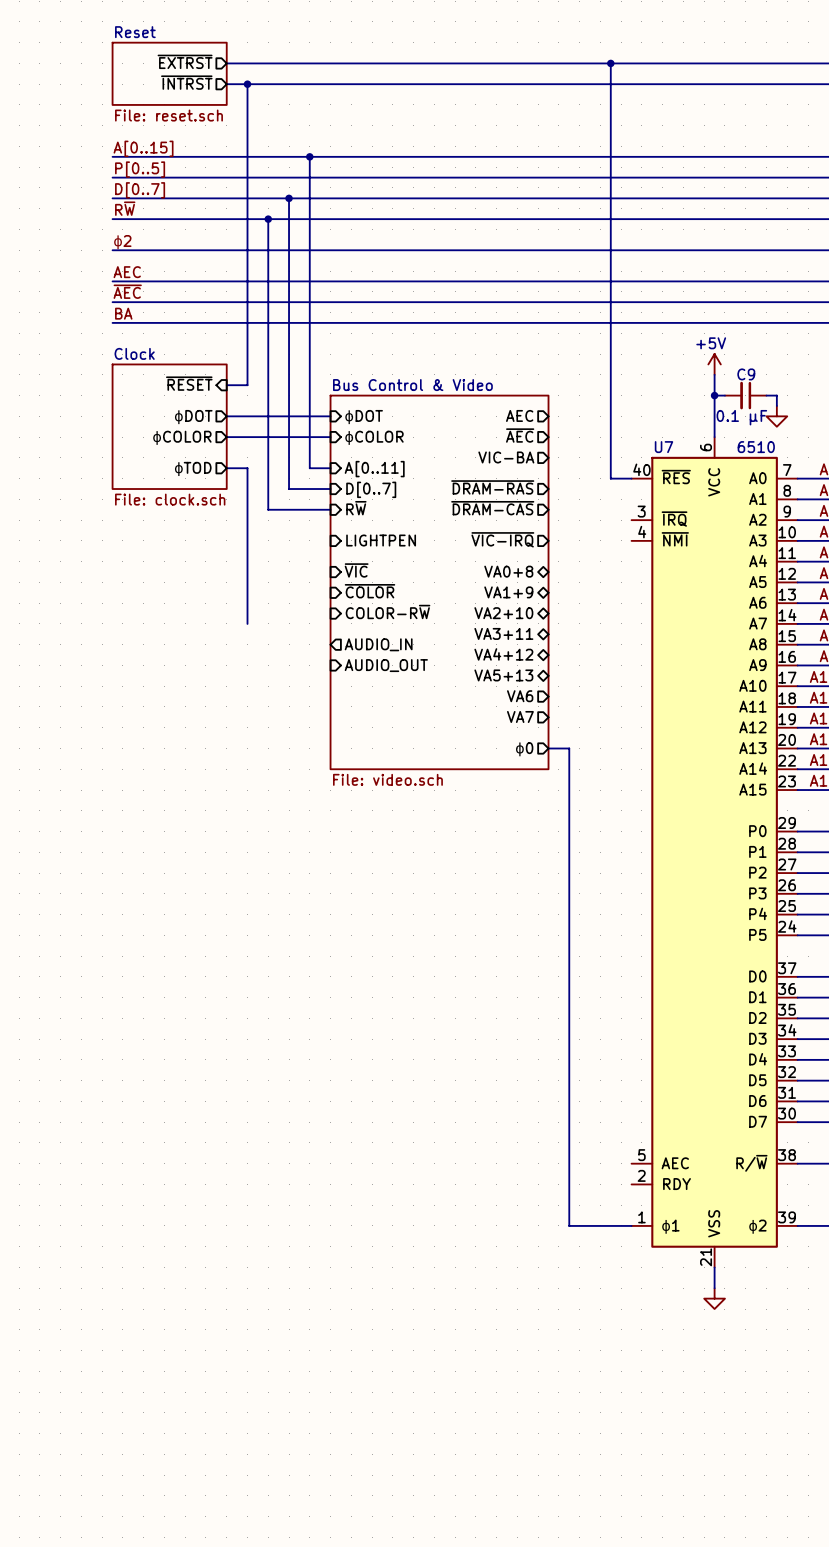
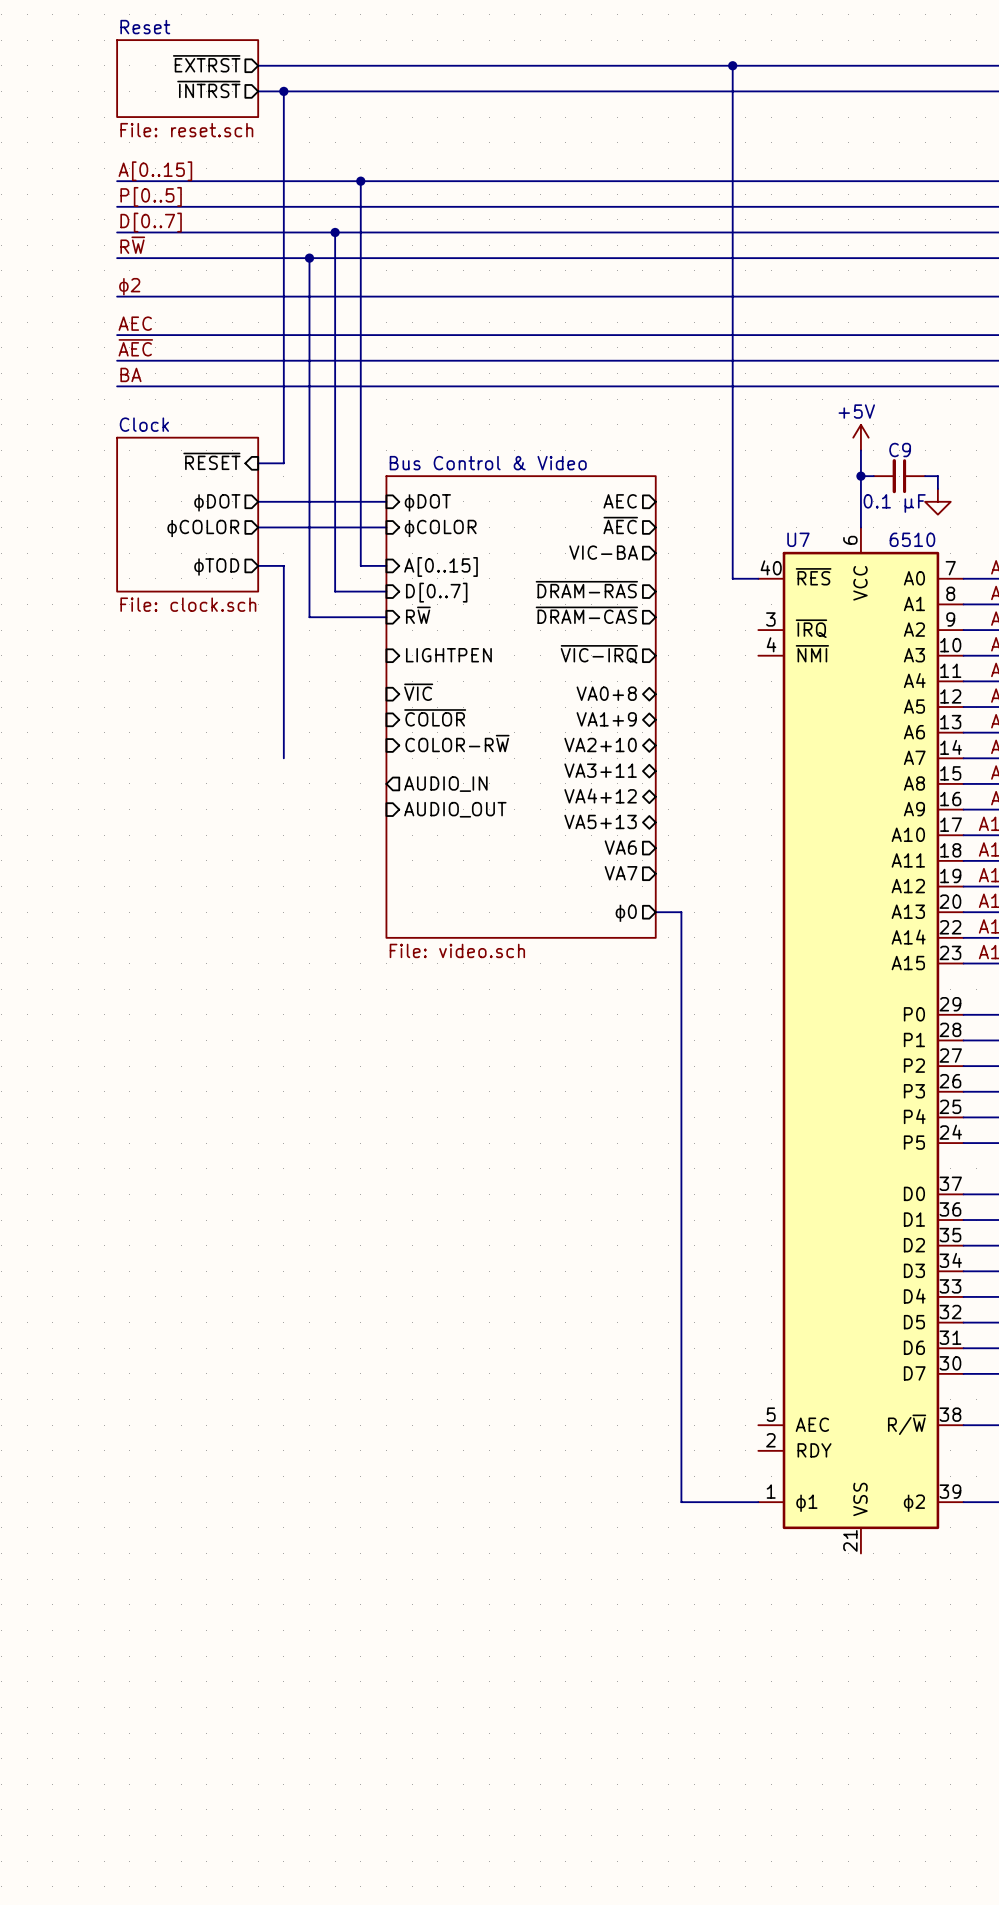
sheet pin: A[0..11] (374, 469) -> A[0..15] (440, 566)
wire: (714, 1267) (714, 1288) -> none
power symbol: (714, 1298) -> none

